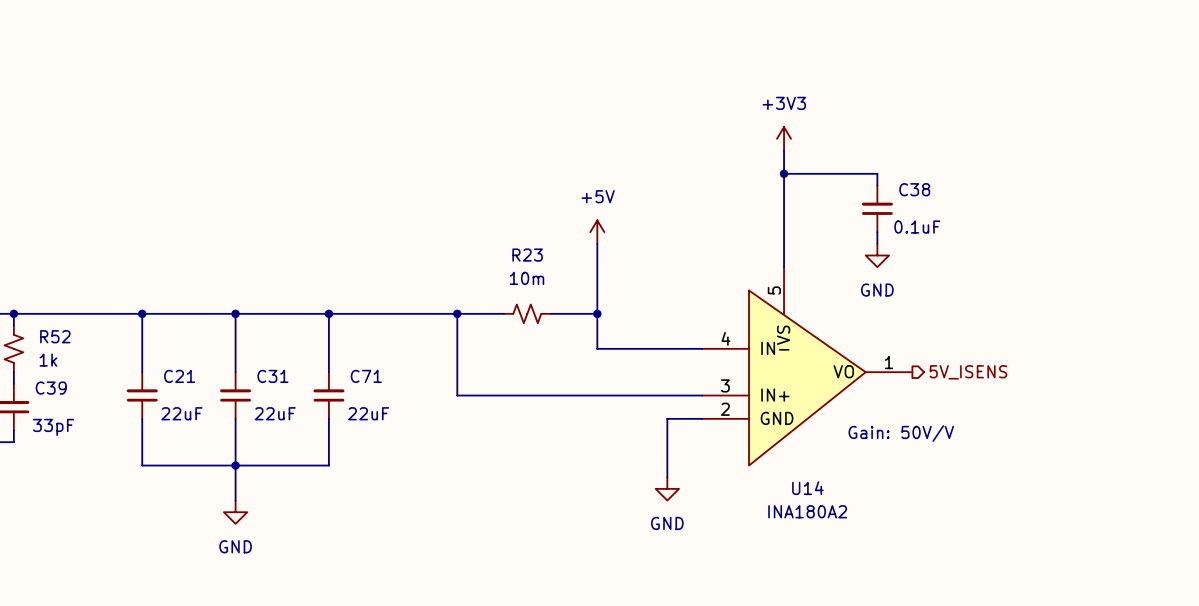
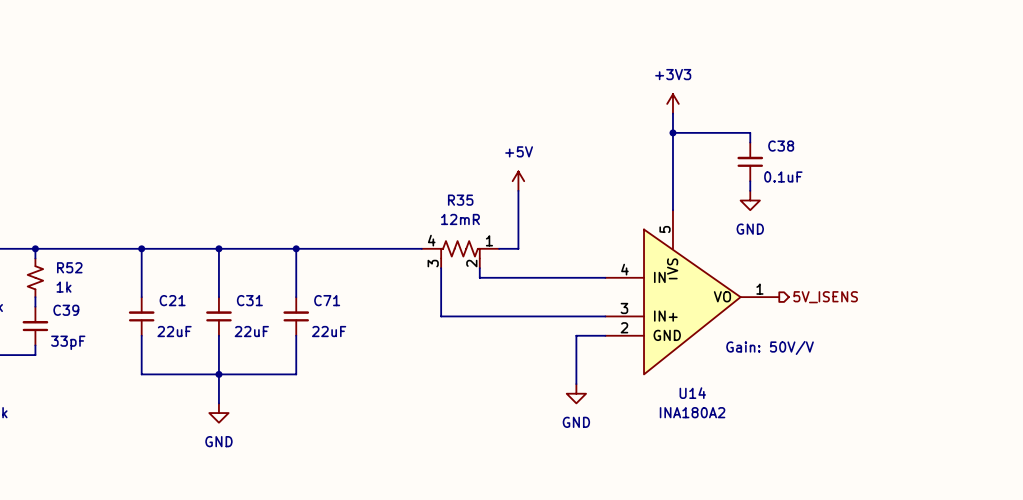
wire: (457, 313) (457, 395) (503, 395) -> (441, 268) (441, 316)
junction: (457, 313) -> none
R23: 10m (527, 313) -> none
wire: (597, 313) (597, 348) -> (479, 268) (479, 277) (518, 277)
junction: (597, 313) -> none
R35: none -> 12mR (460, 254)

